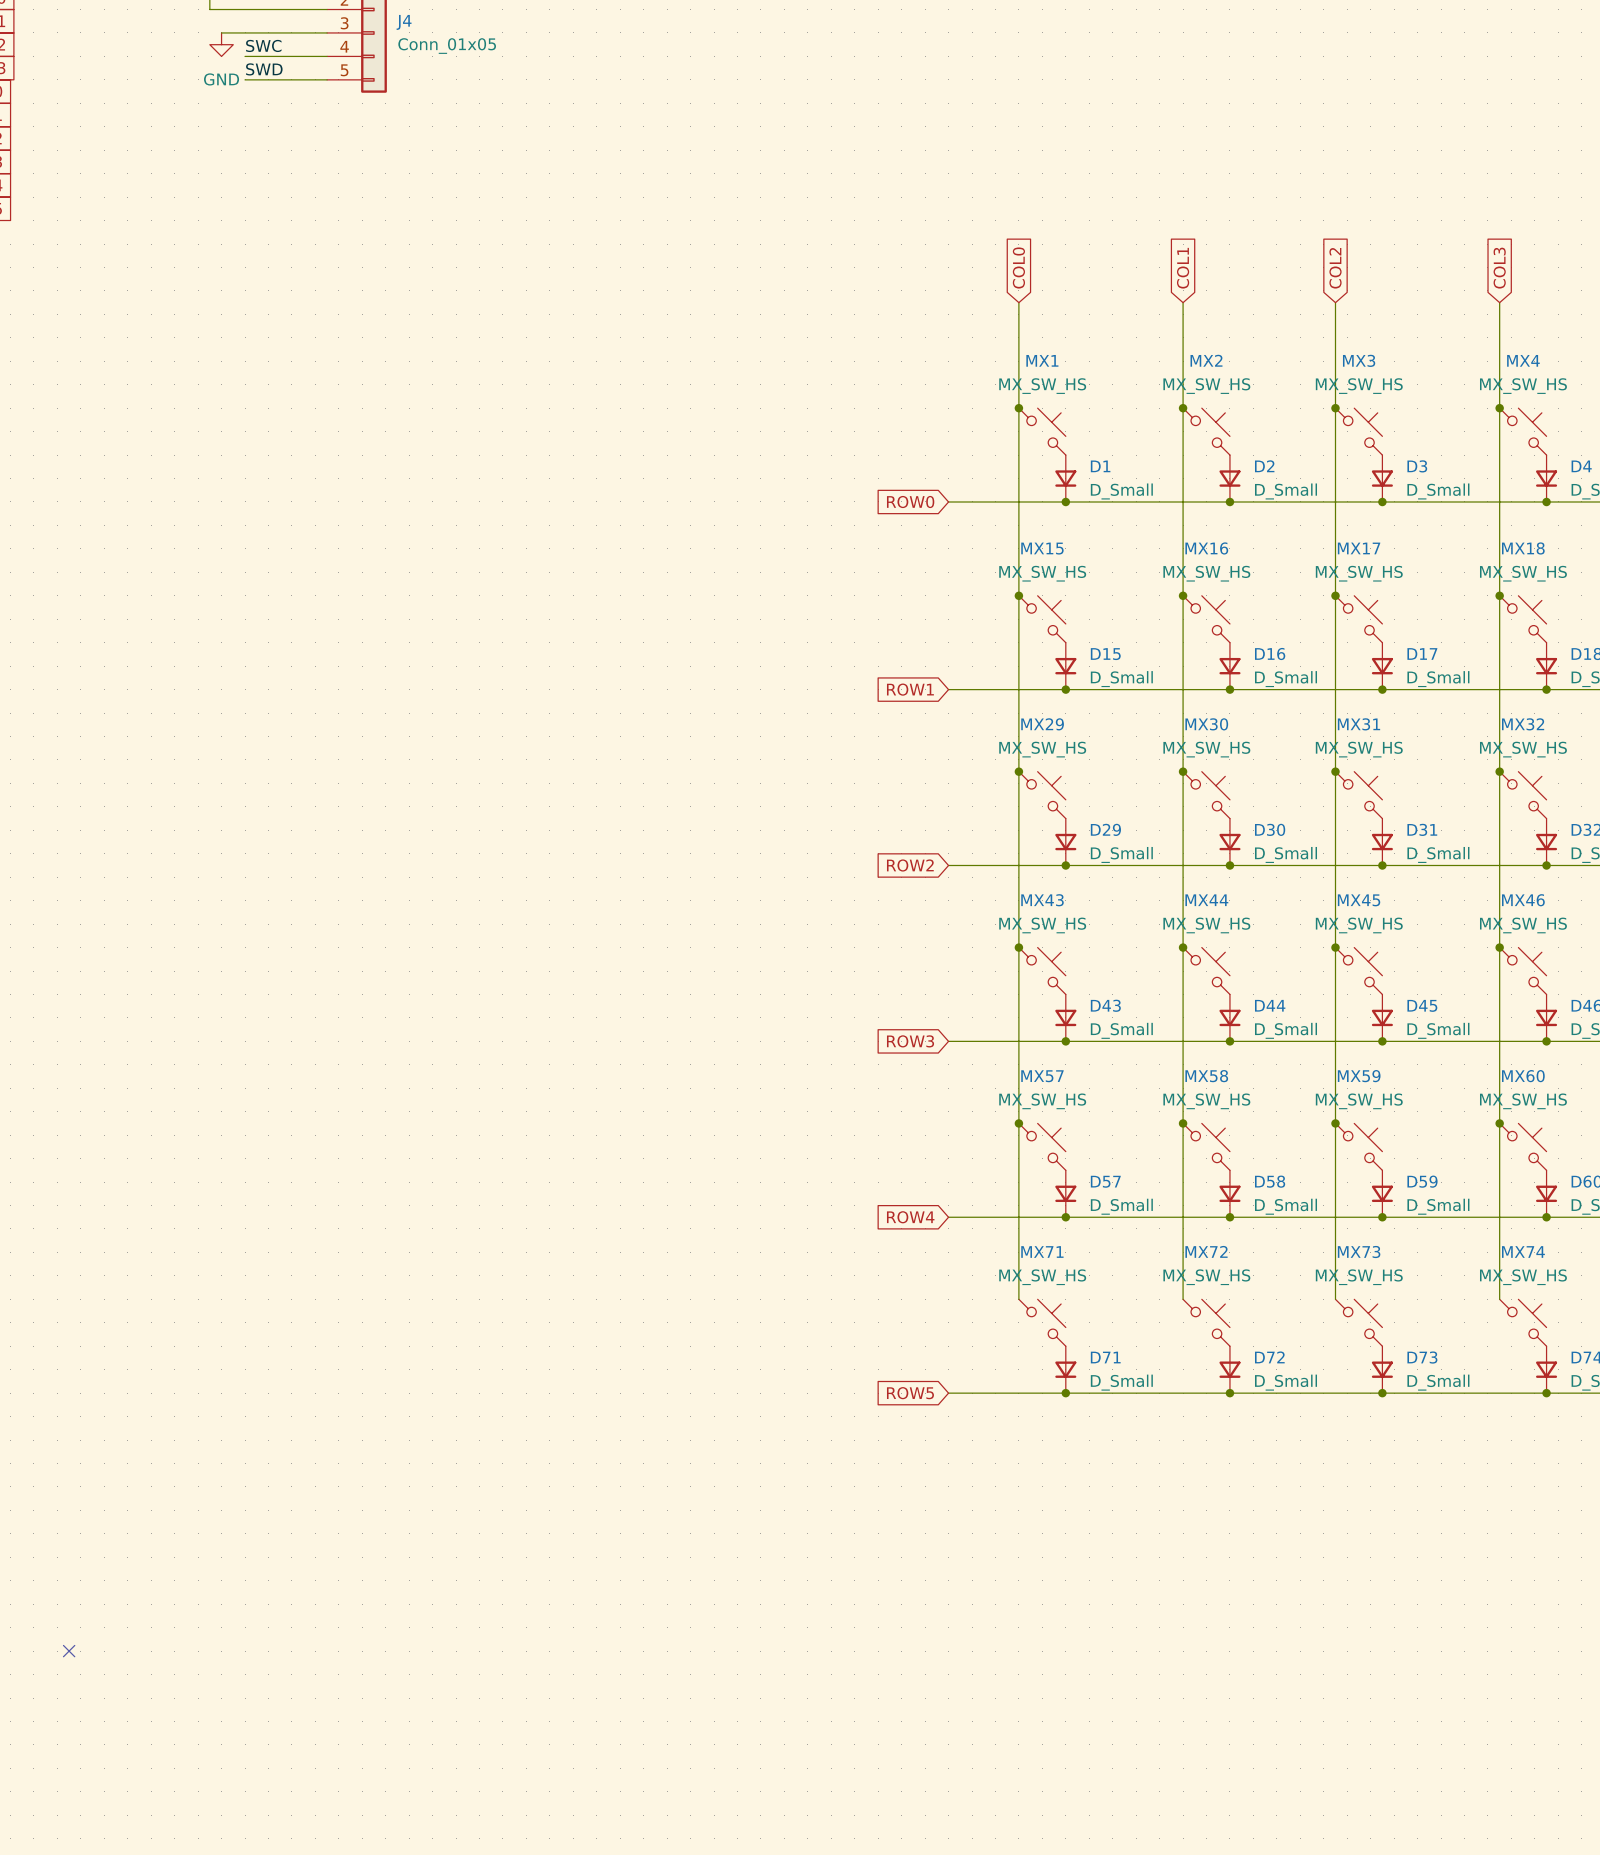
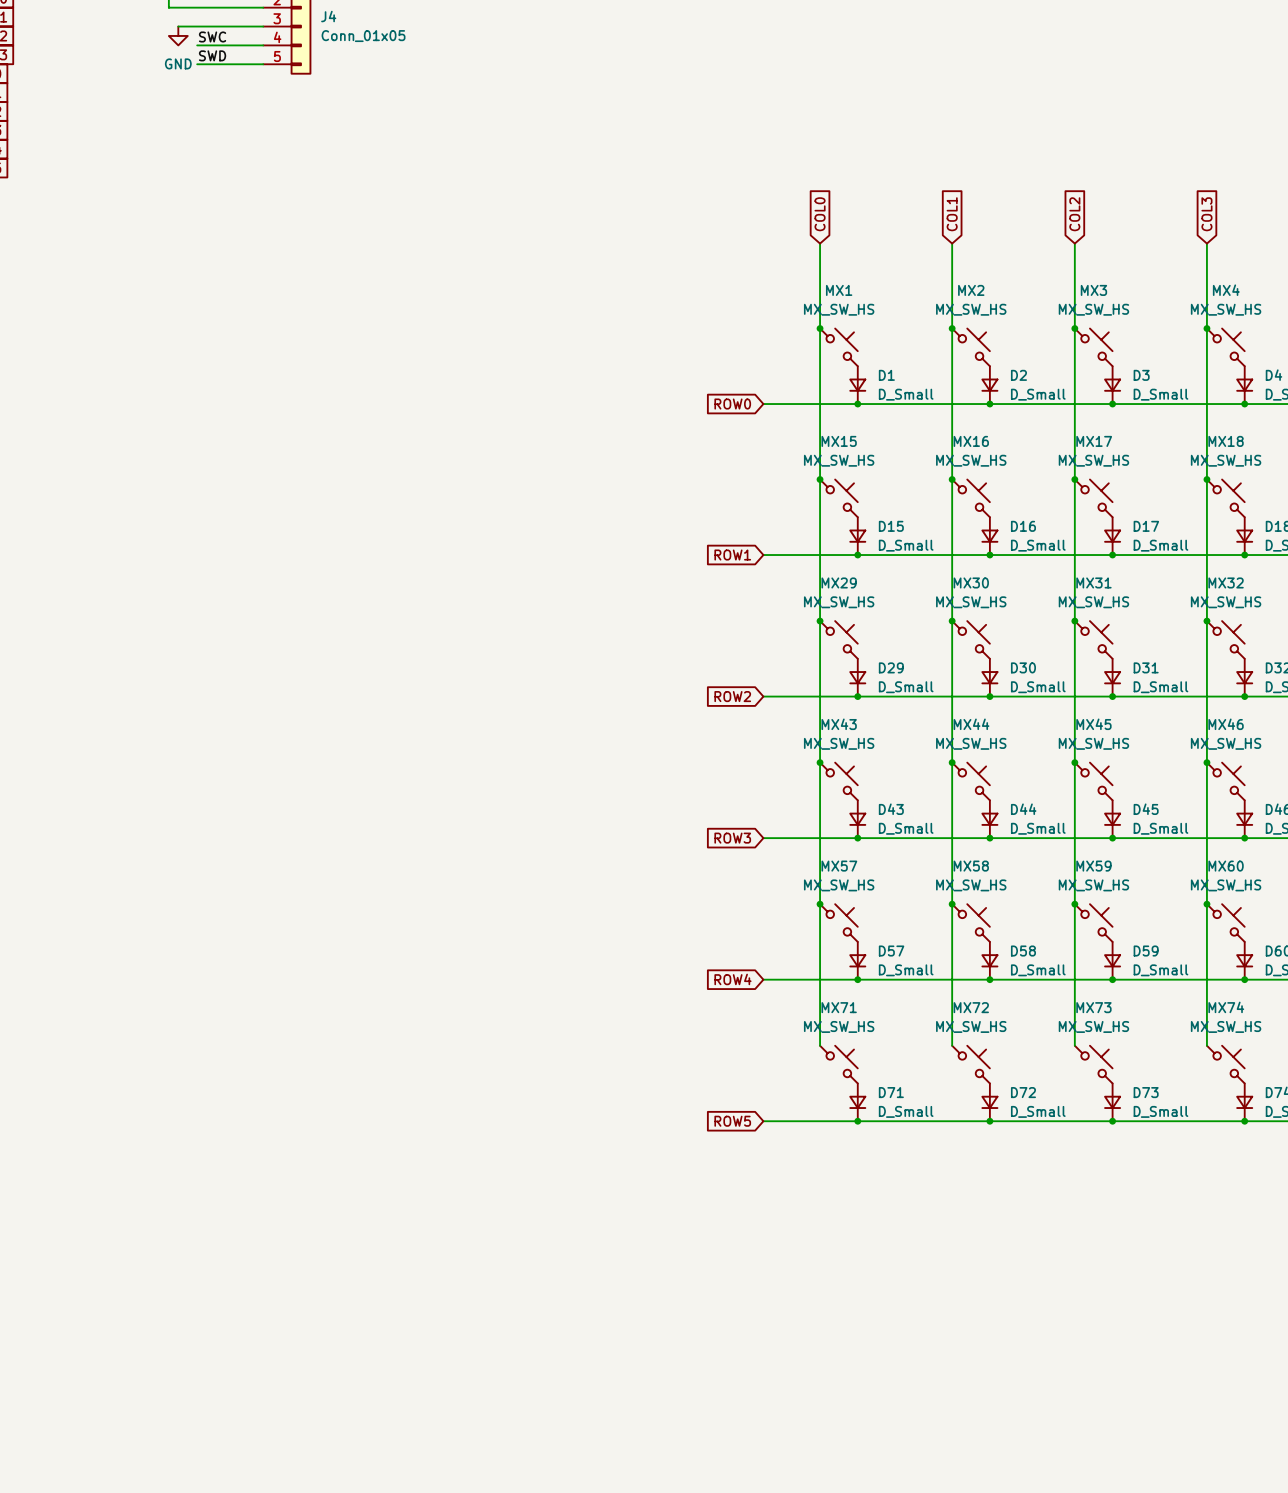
no-connect mark: (69, 1651) -> none

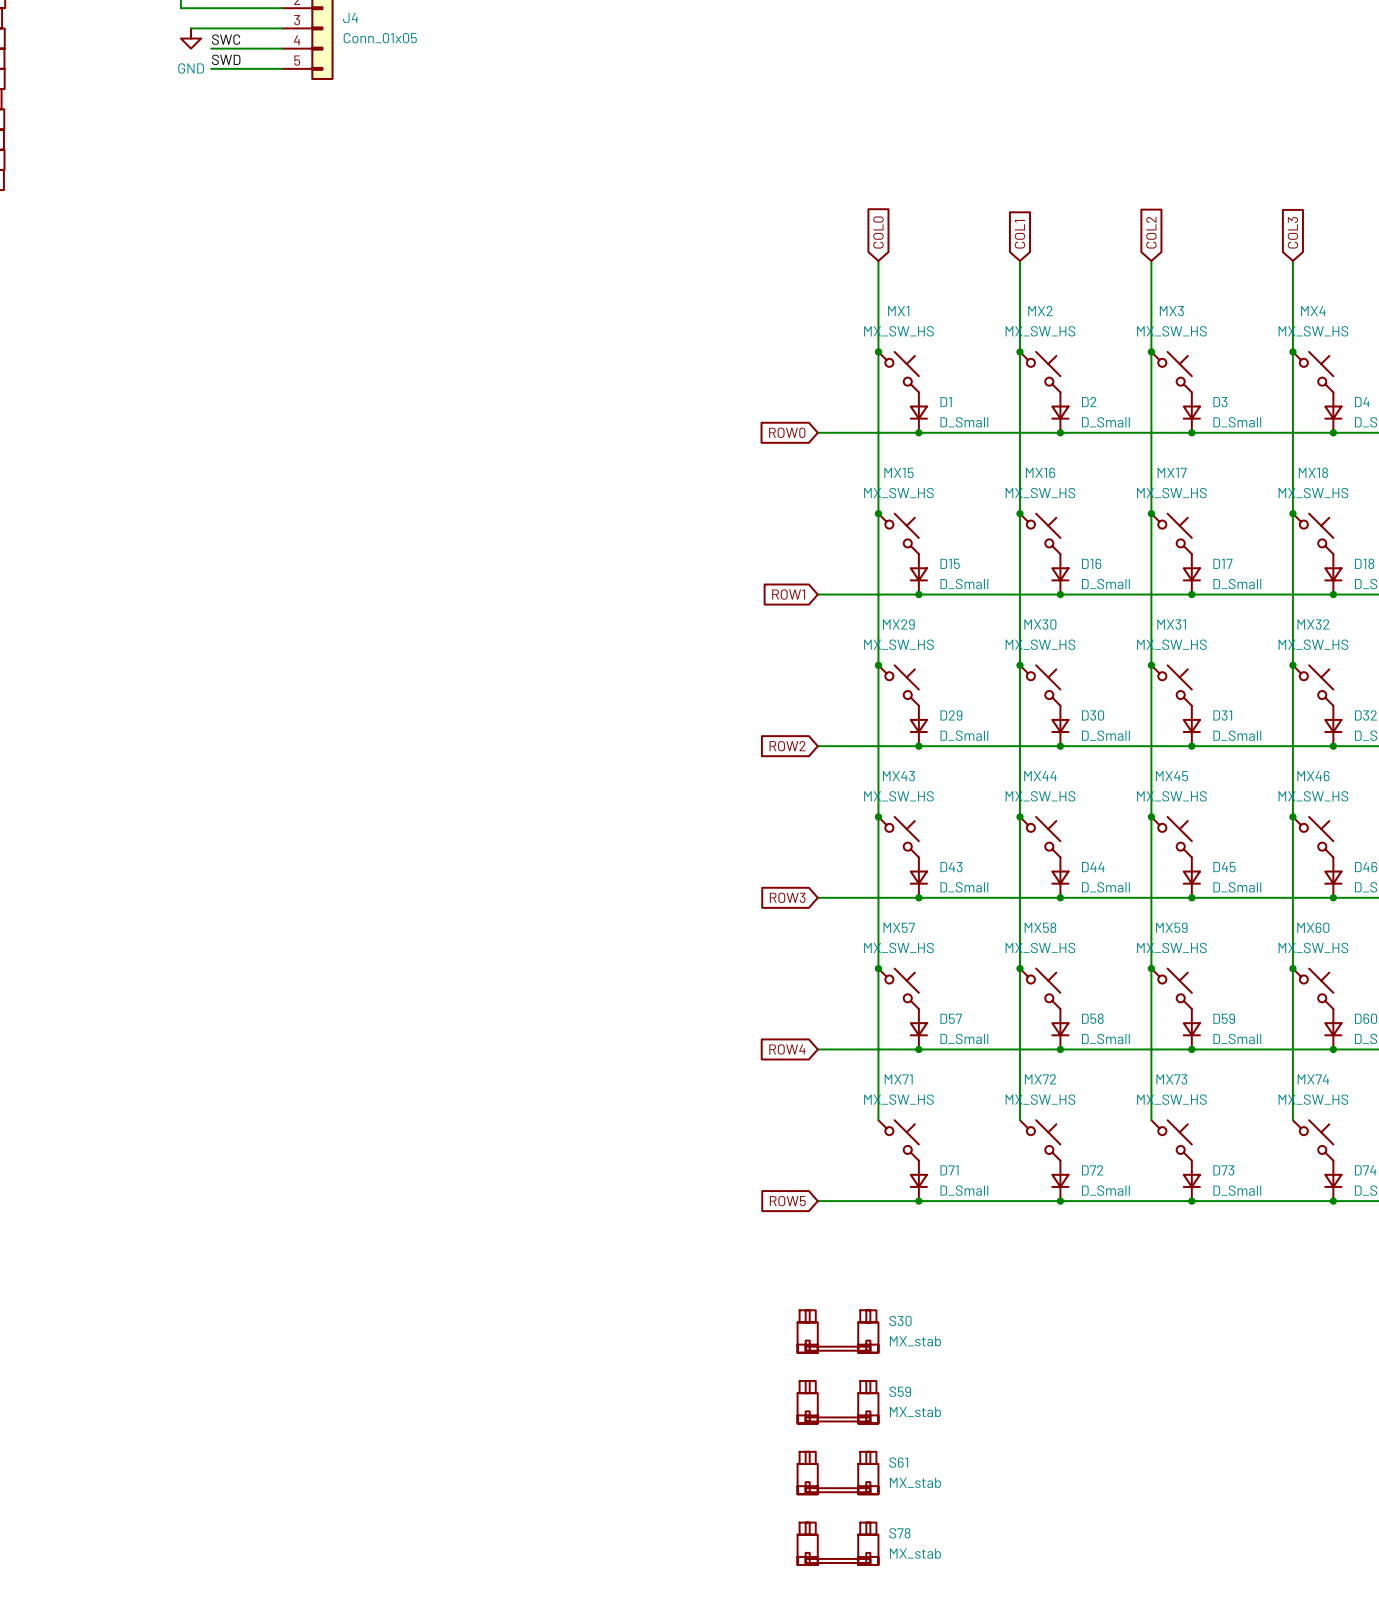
S30: none -> MX_stab (838, 1331)
S59: none -> MX_stab (838, 1402)
S61: none -> MX_stab (838, 1473)
S78: none -> MX_stab (838, 1543)

